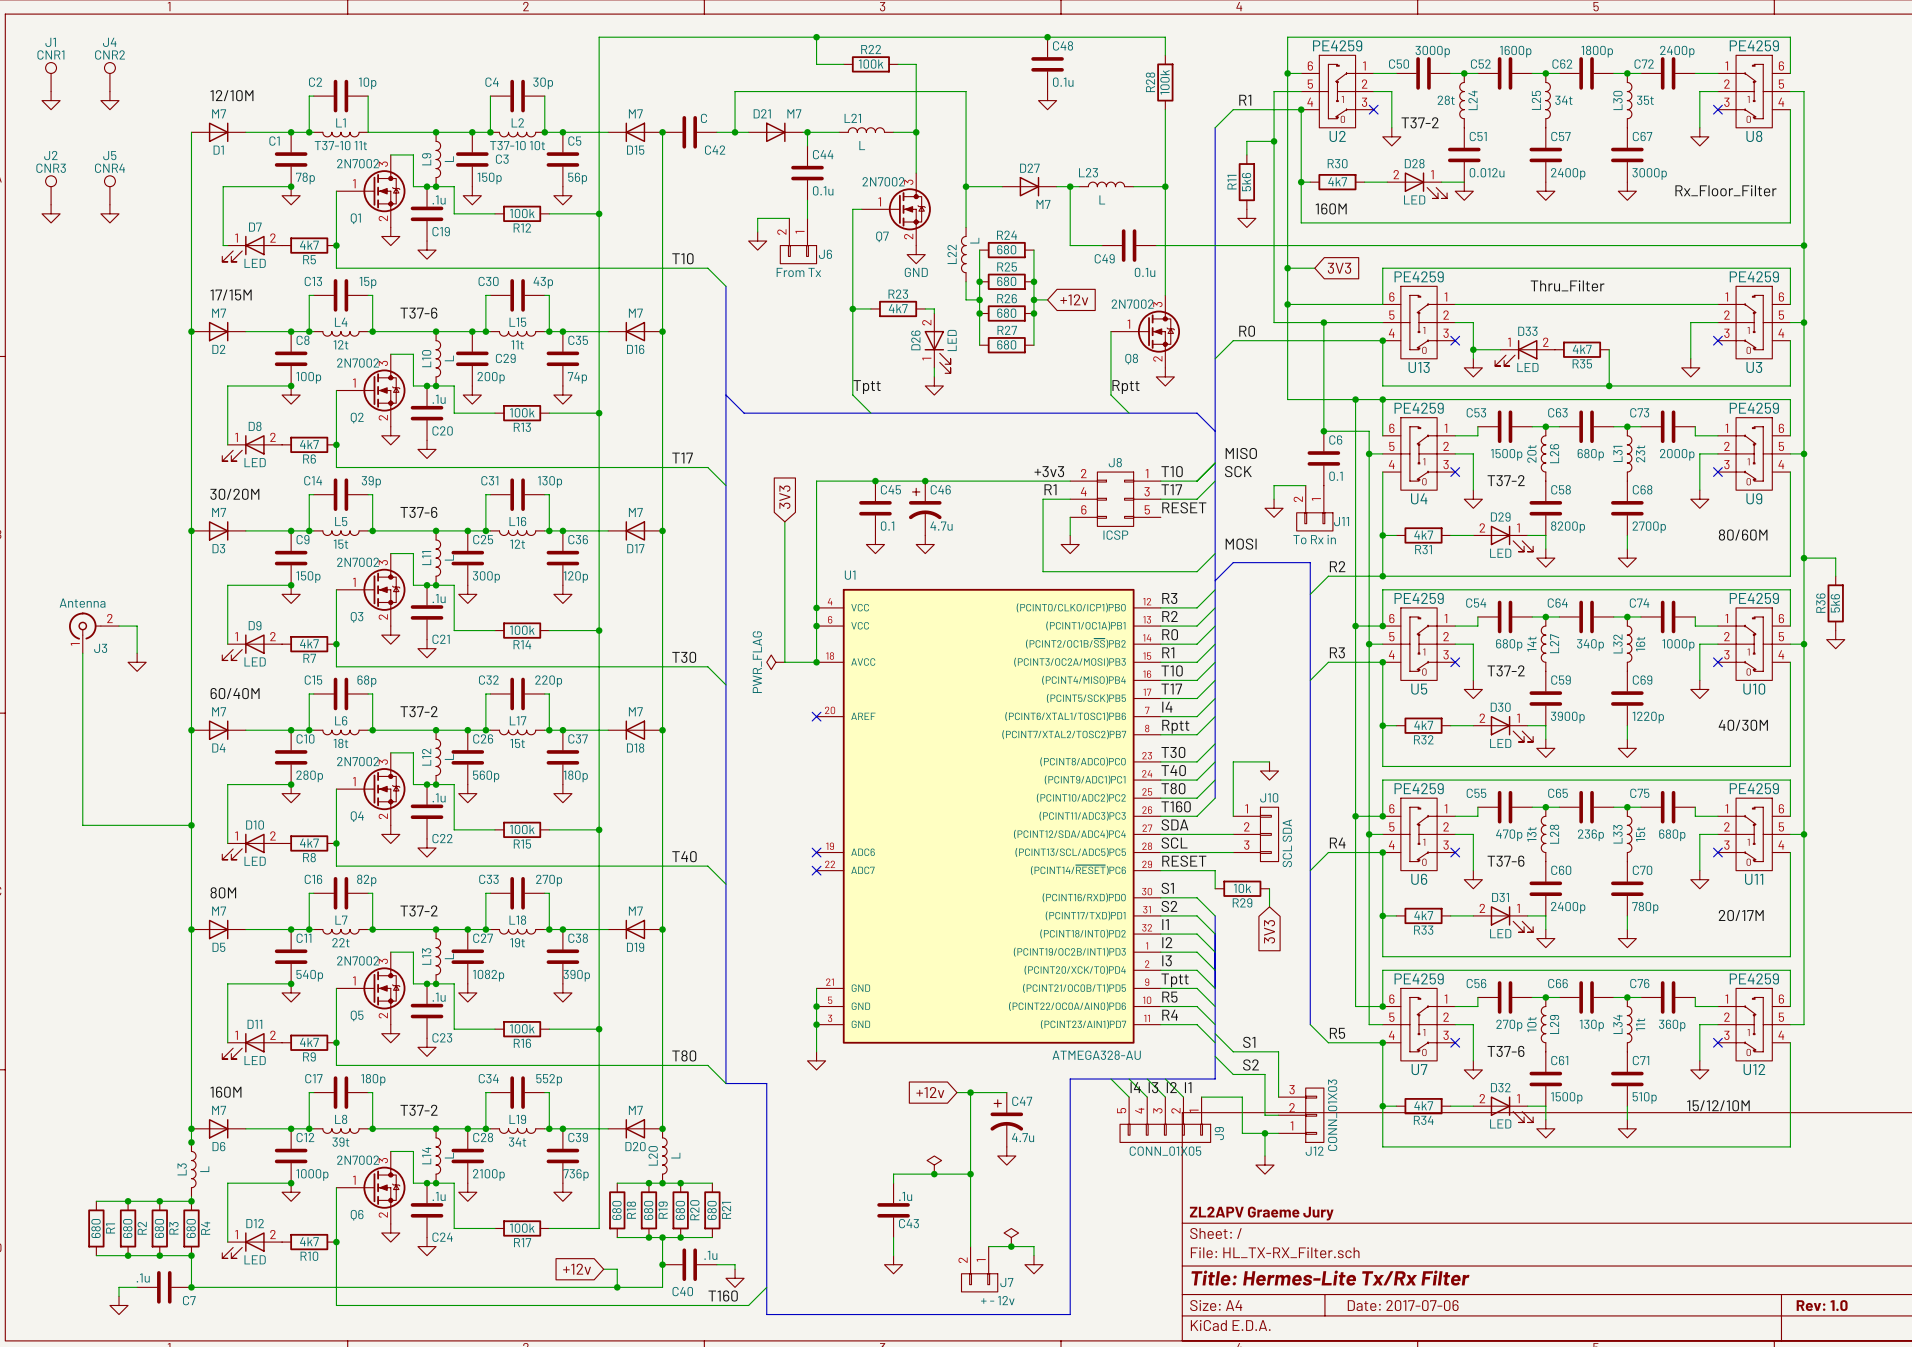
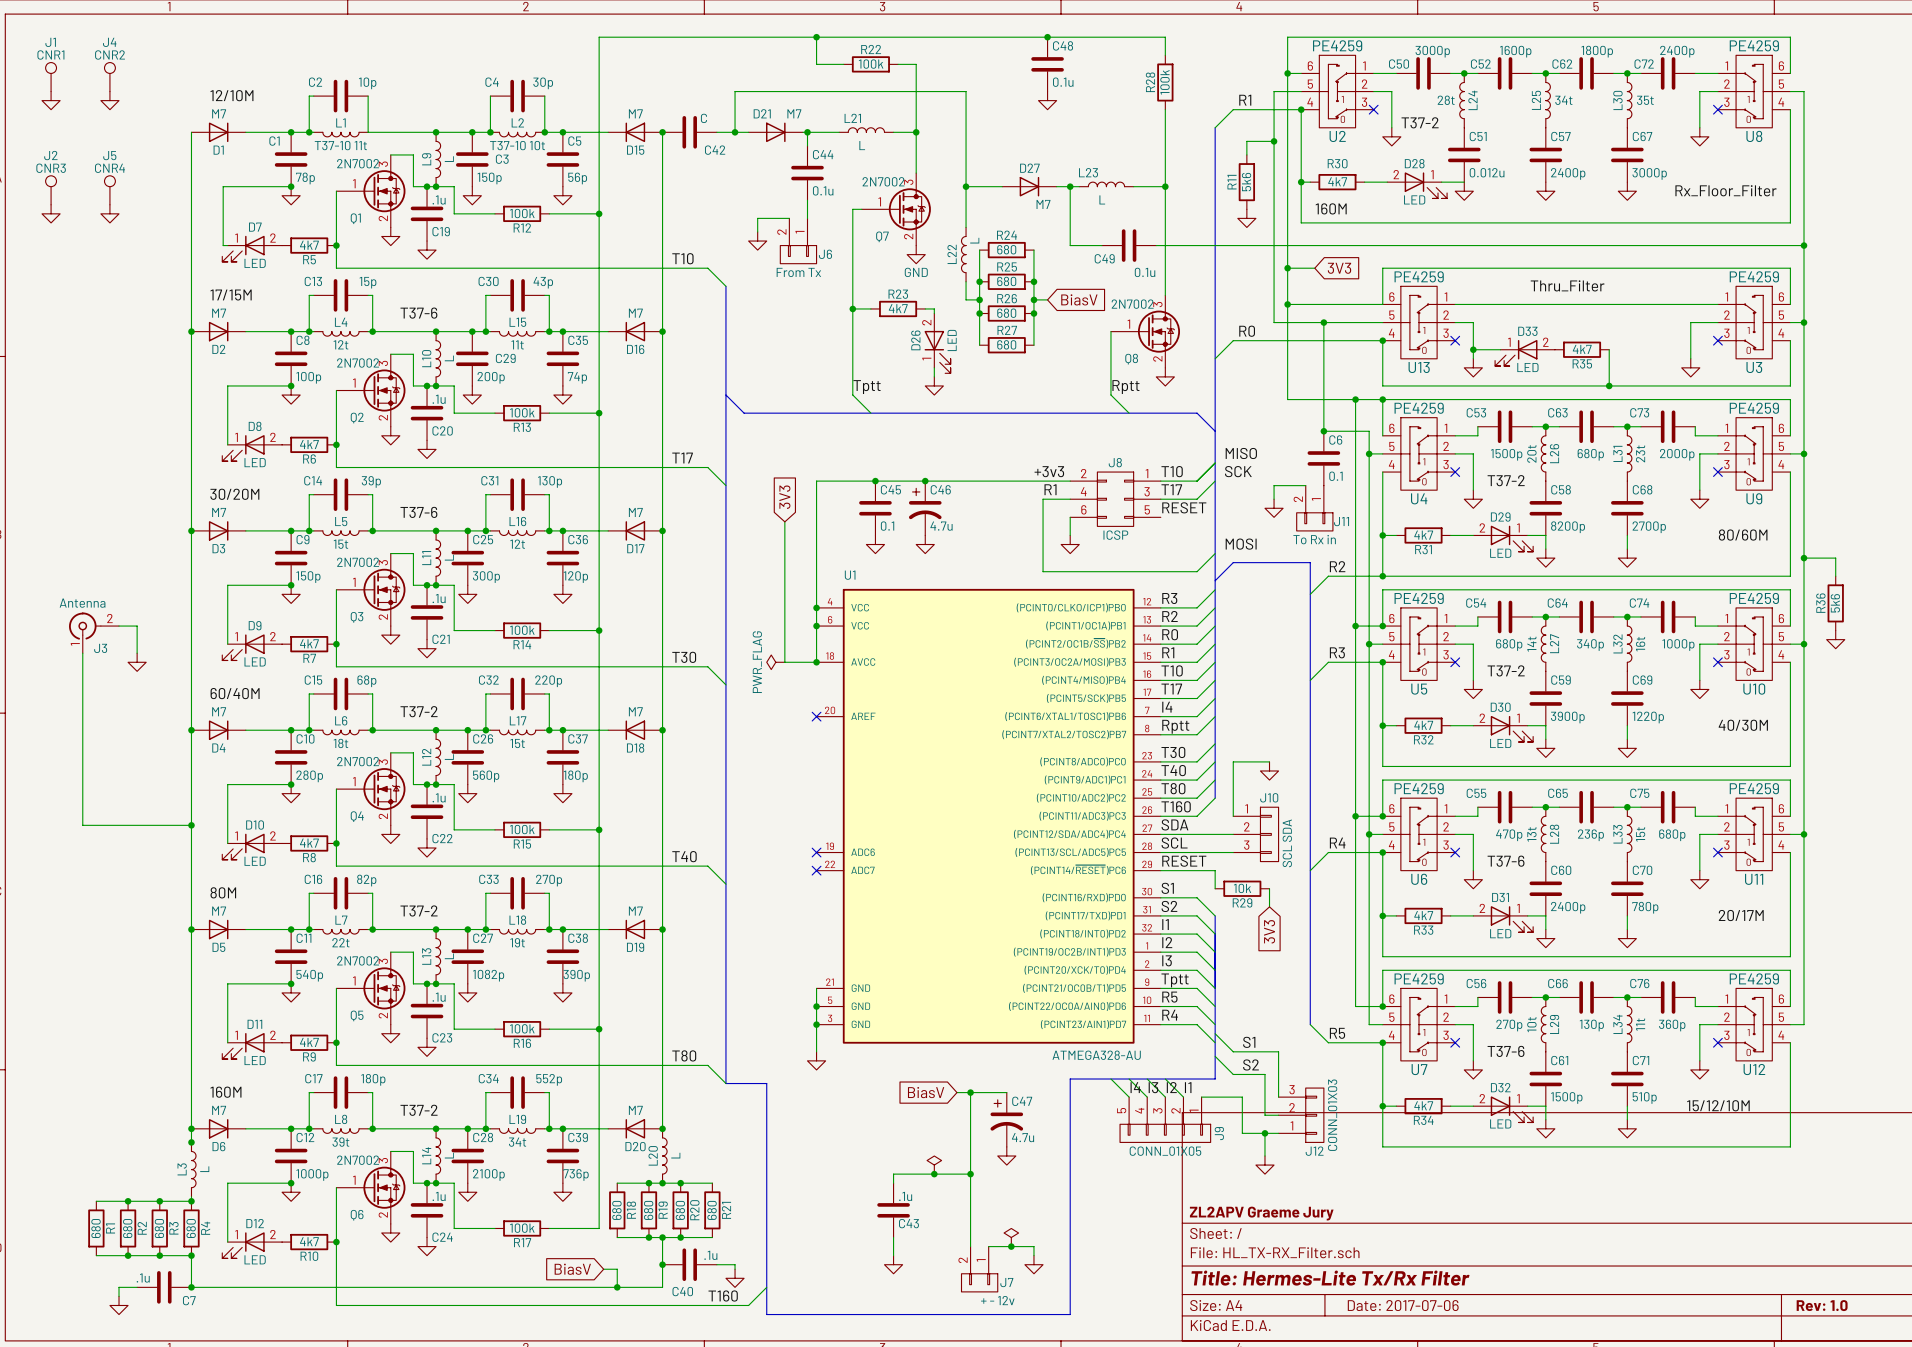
global label: +12v (1074, 299) -> BiasV (1079, 299)
global label: +12v (930, 1092) -> BiasV (926, 1092)
global label: +12v (577, 1269) -> BiasV (572, 1269)

